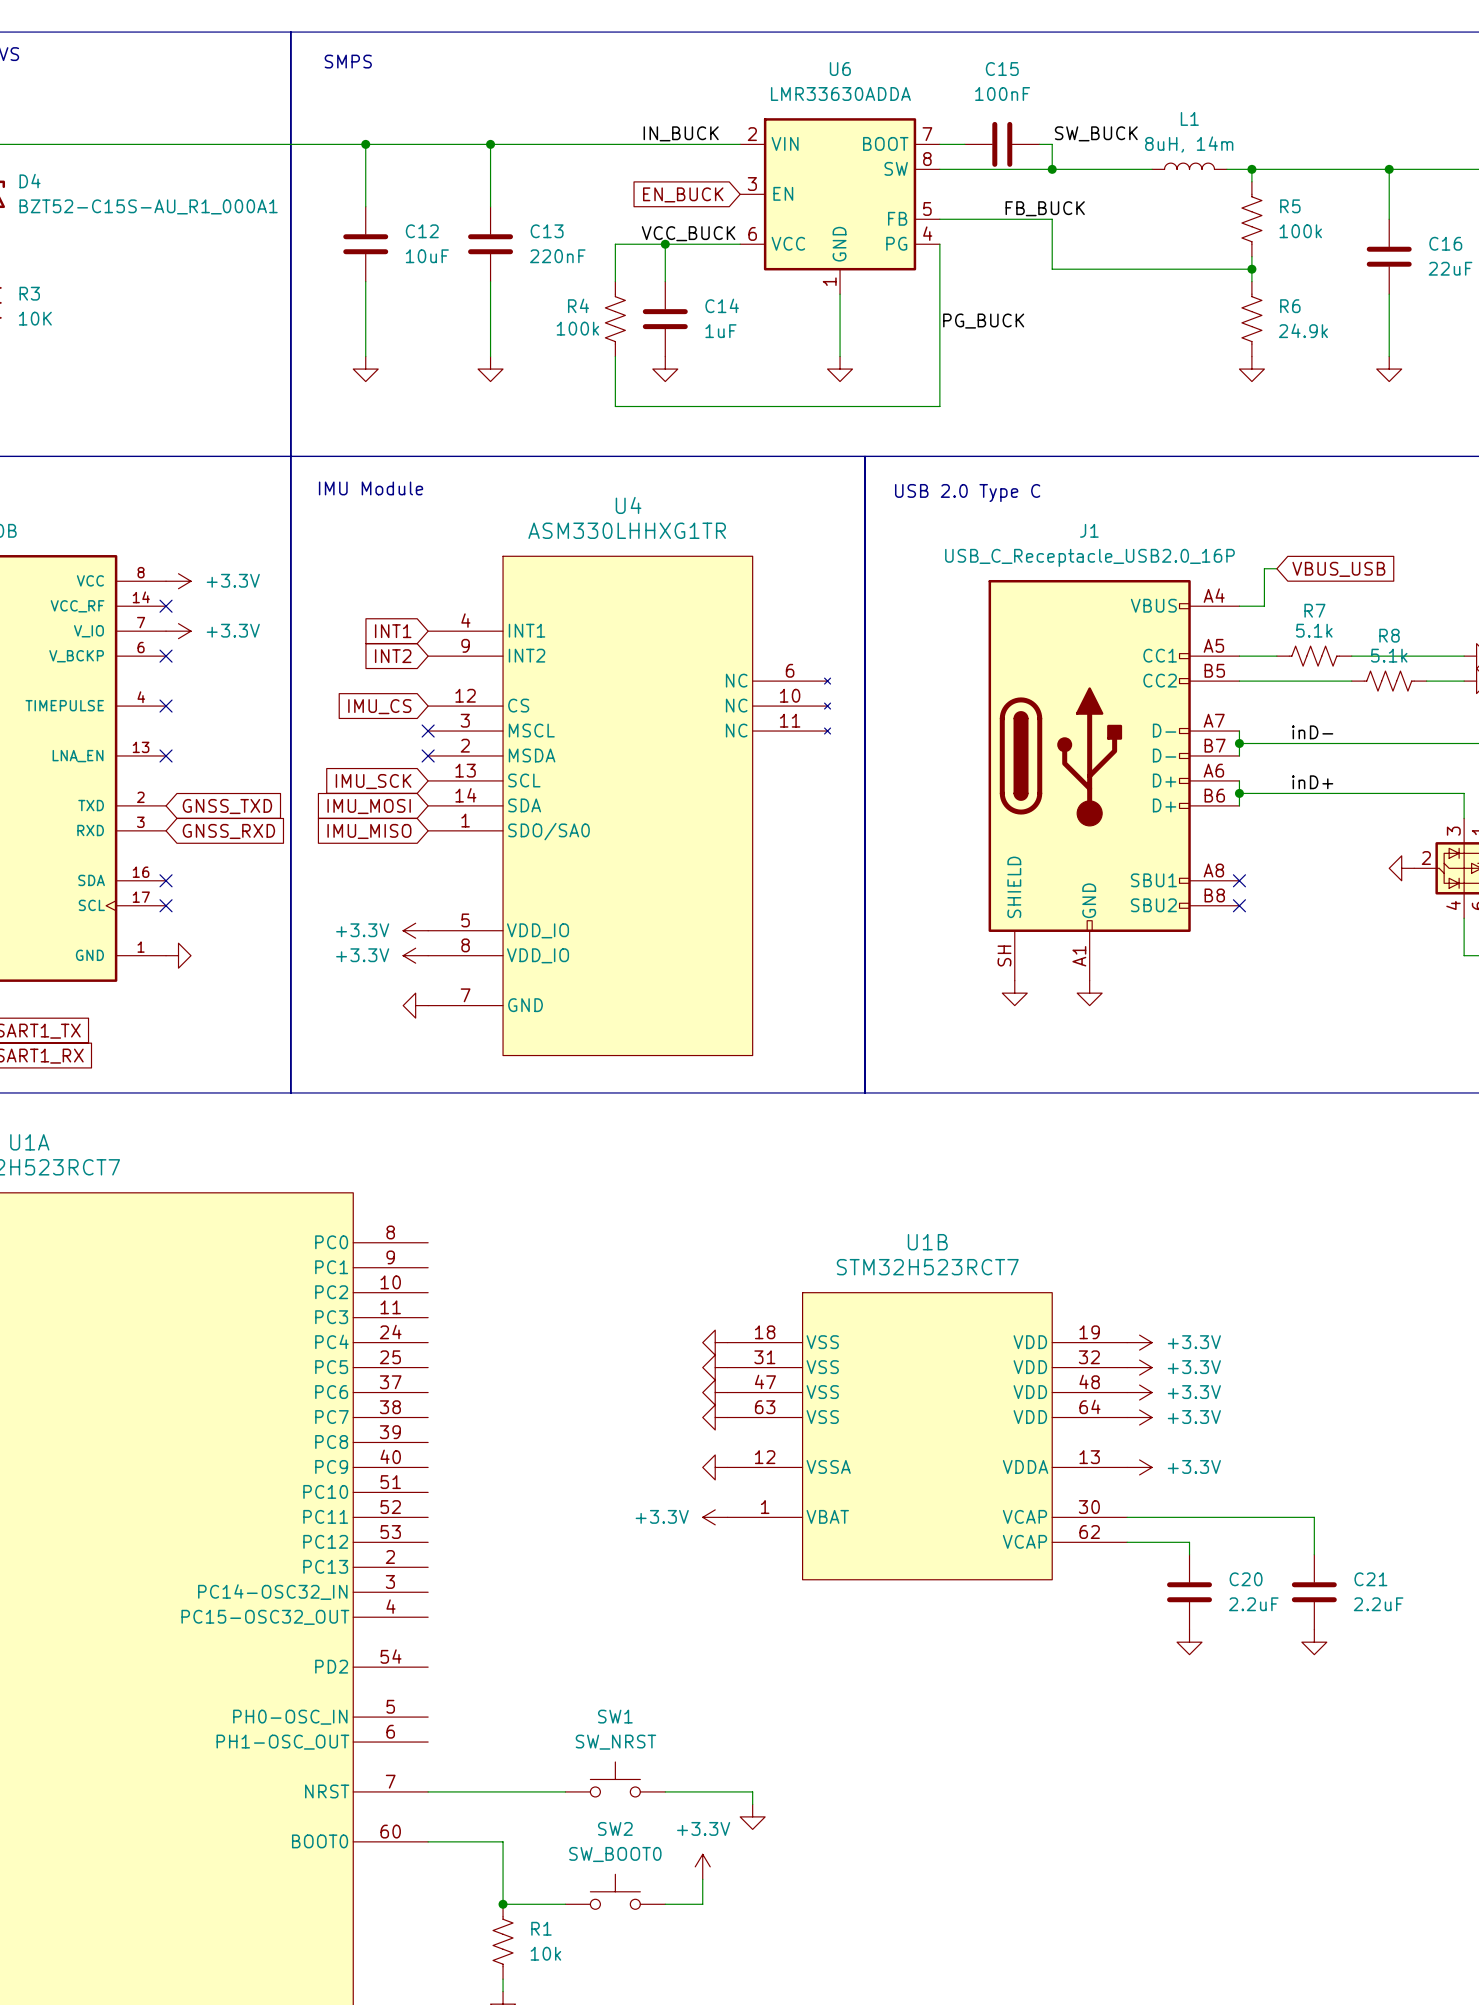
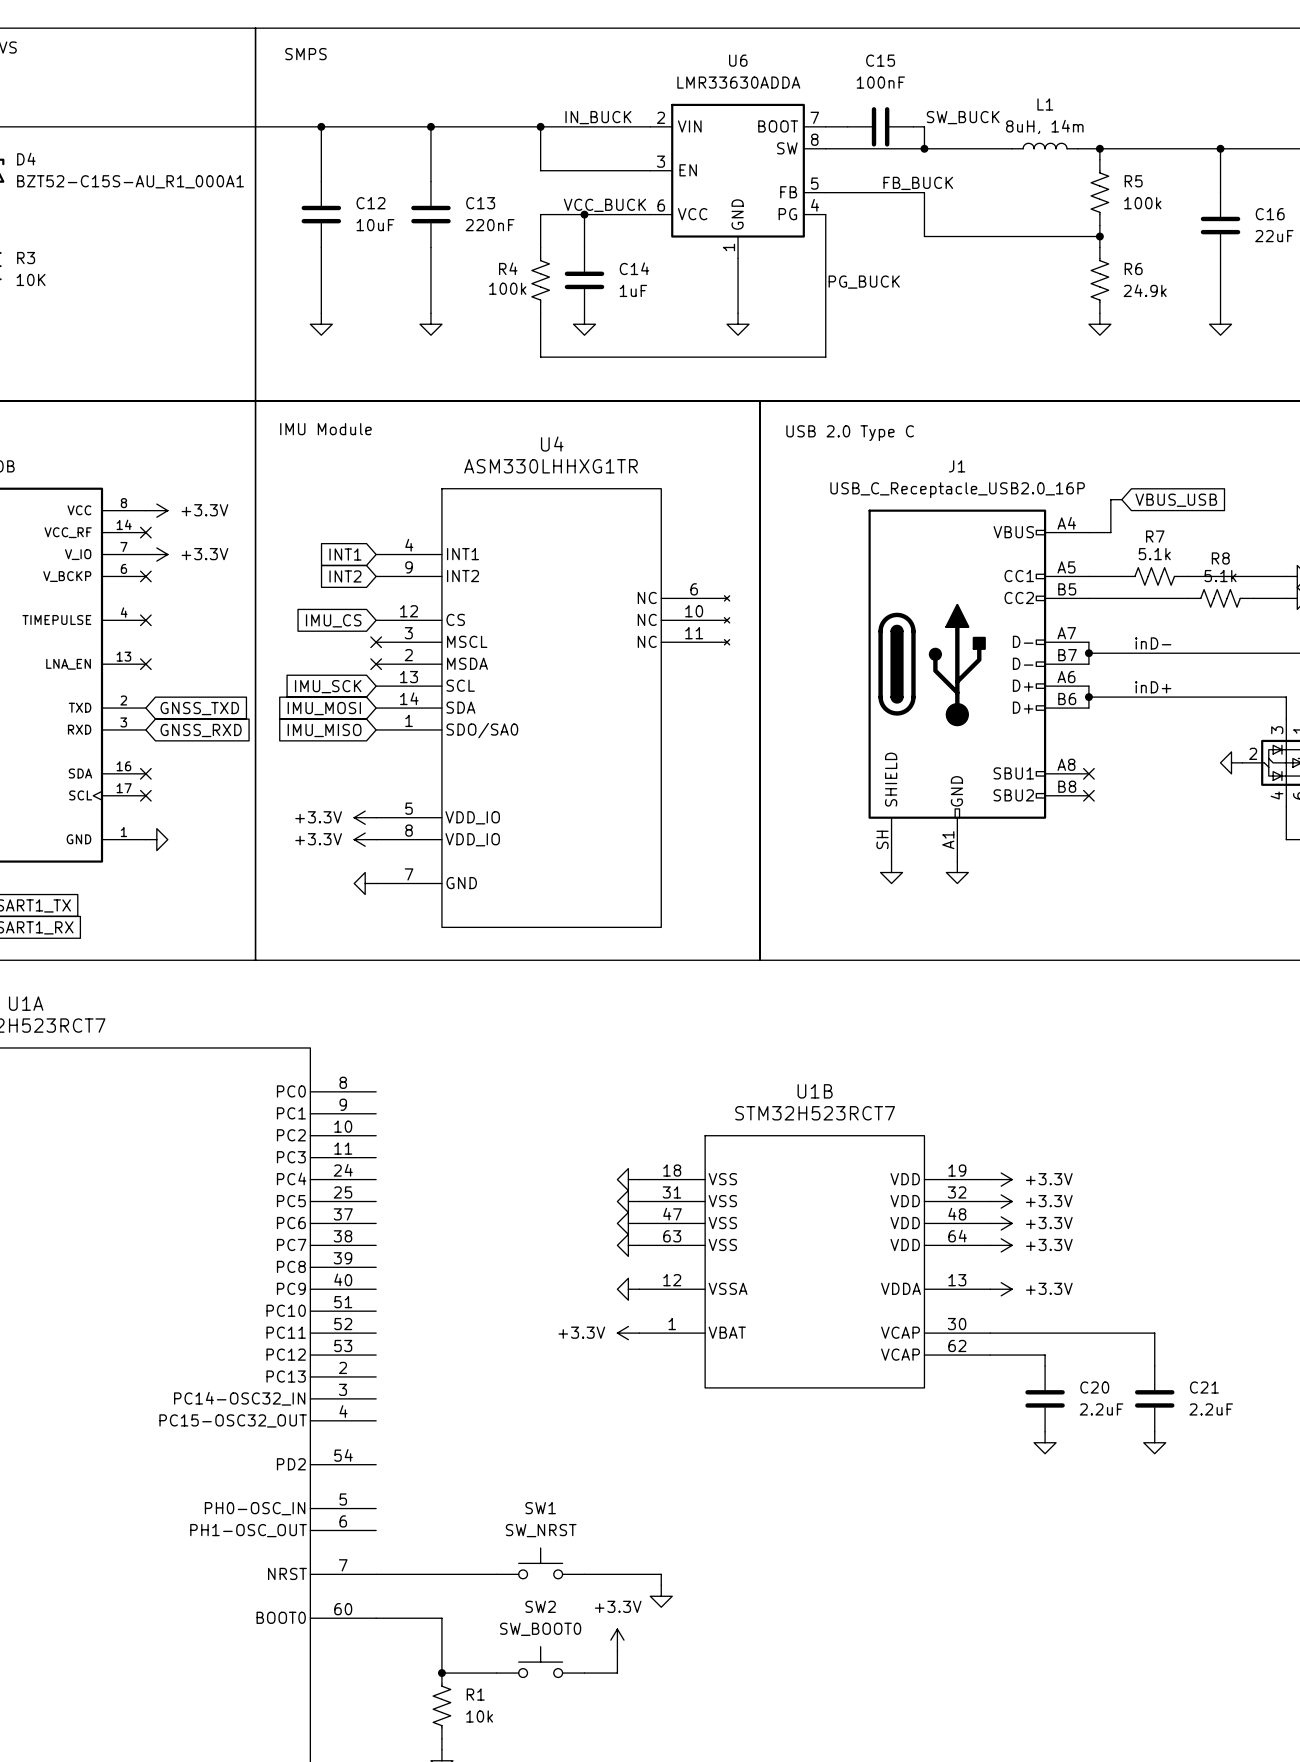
wire: none -> (540, 126) (540, 170) (650, 170)
junction: none -> (540, 126)
global label: EN_BUCK (683, 194) -> none

